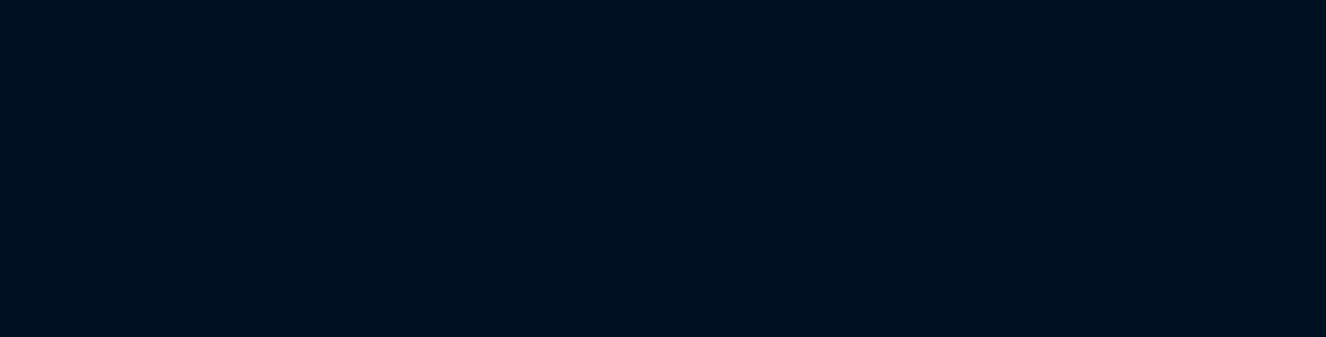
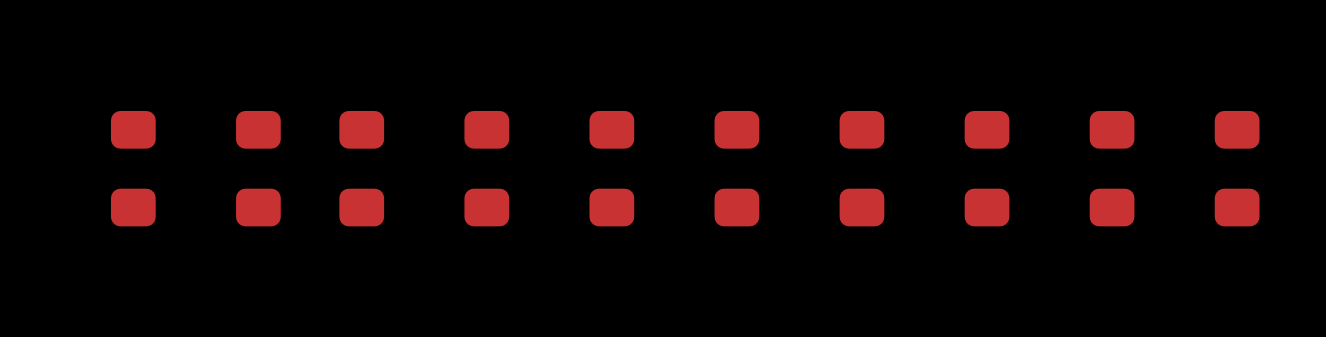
part: none -> (133, 168)
part: none -> (258, 168)
part: none -> (361, 168)
part: none -> (486, 168)
part: none -> (611, 168)
part: none -> (736, 168)
part: none -> (861, 168)
part: none -> (987, 168)
part: none -> (1112, 168)
part: none -> (1237, 168)

